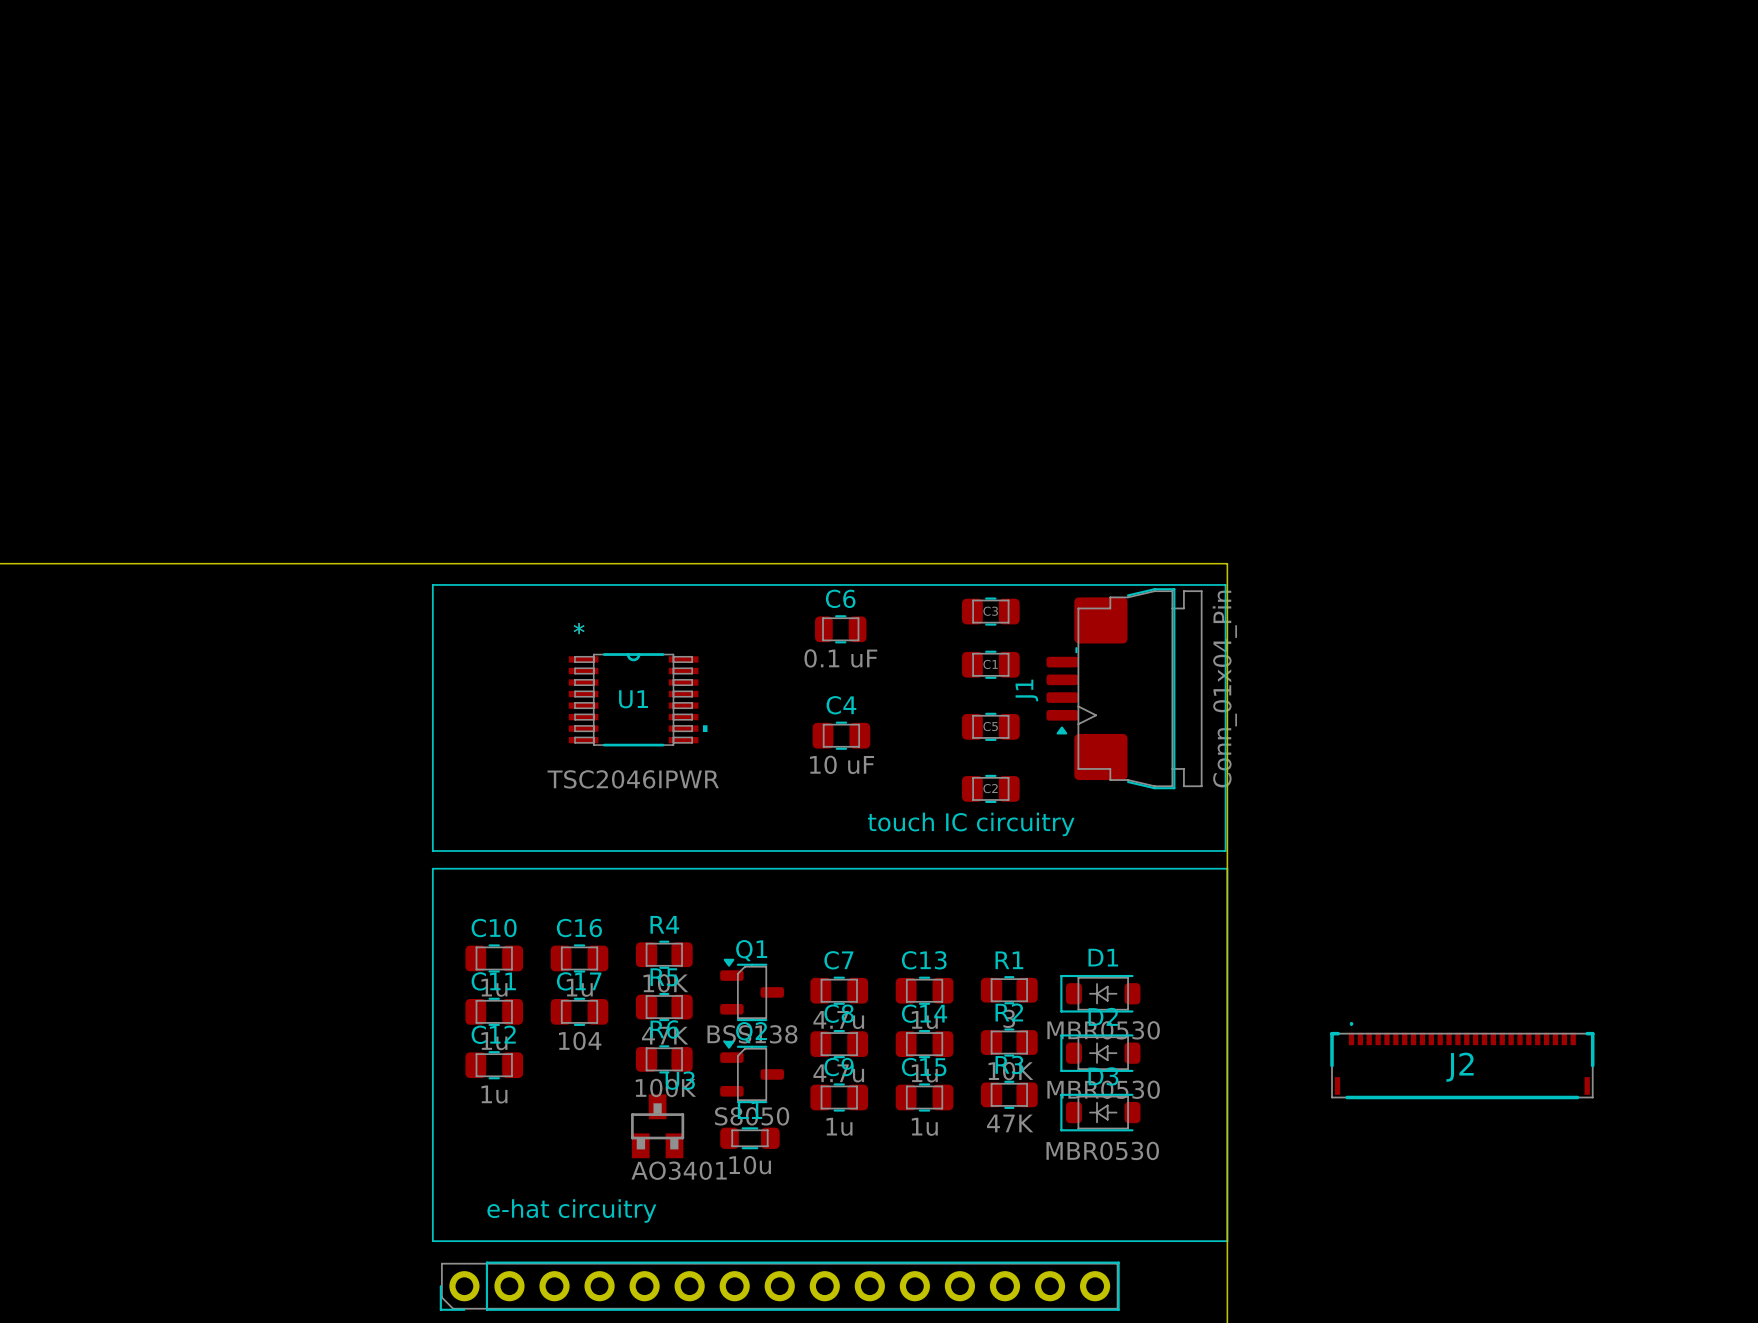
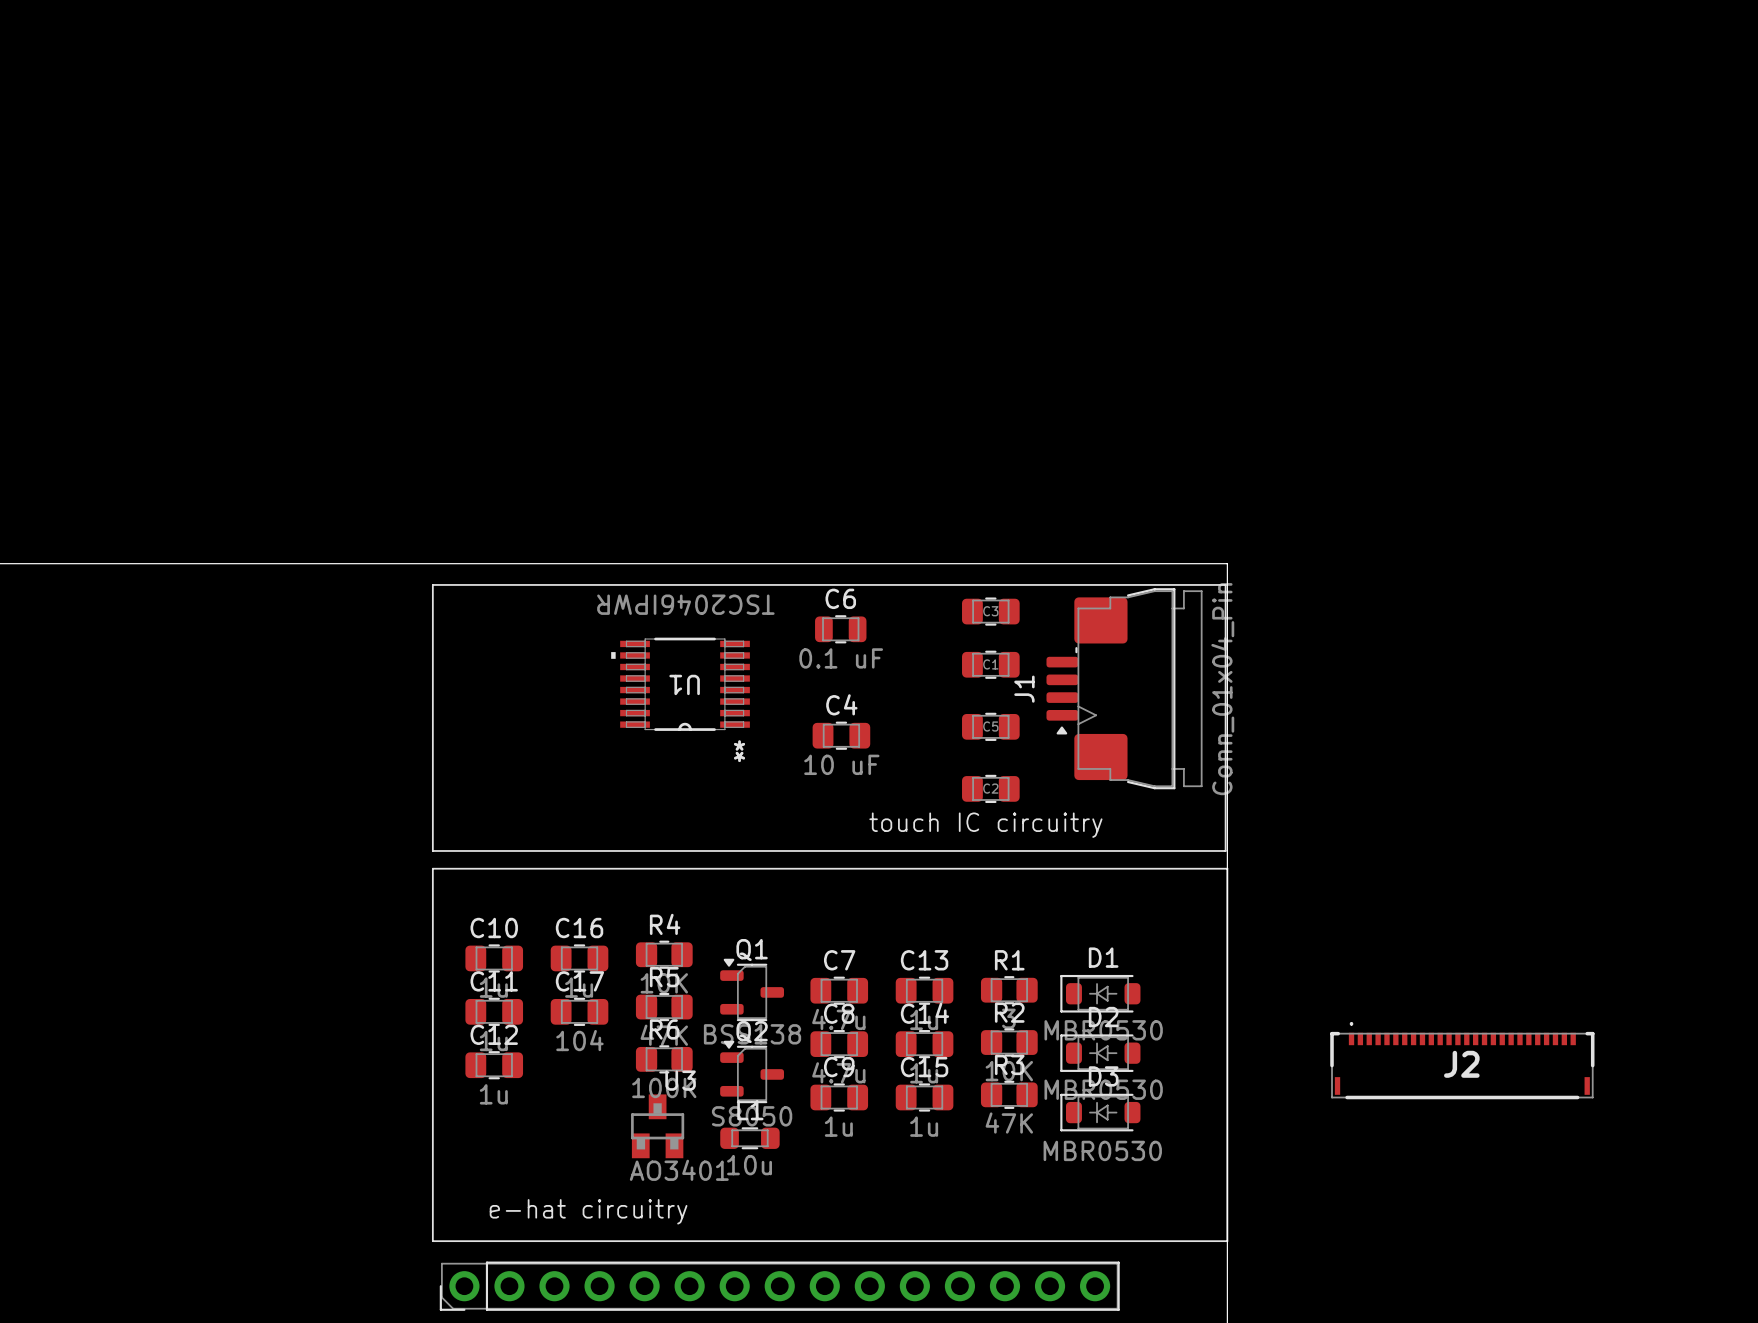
U1 rotation: 0° (638, 699) -> 180° (680, 684)

